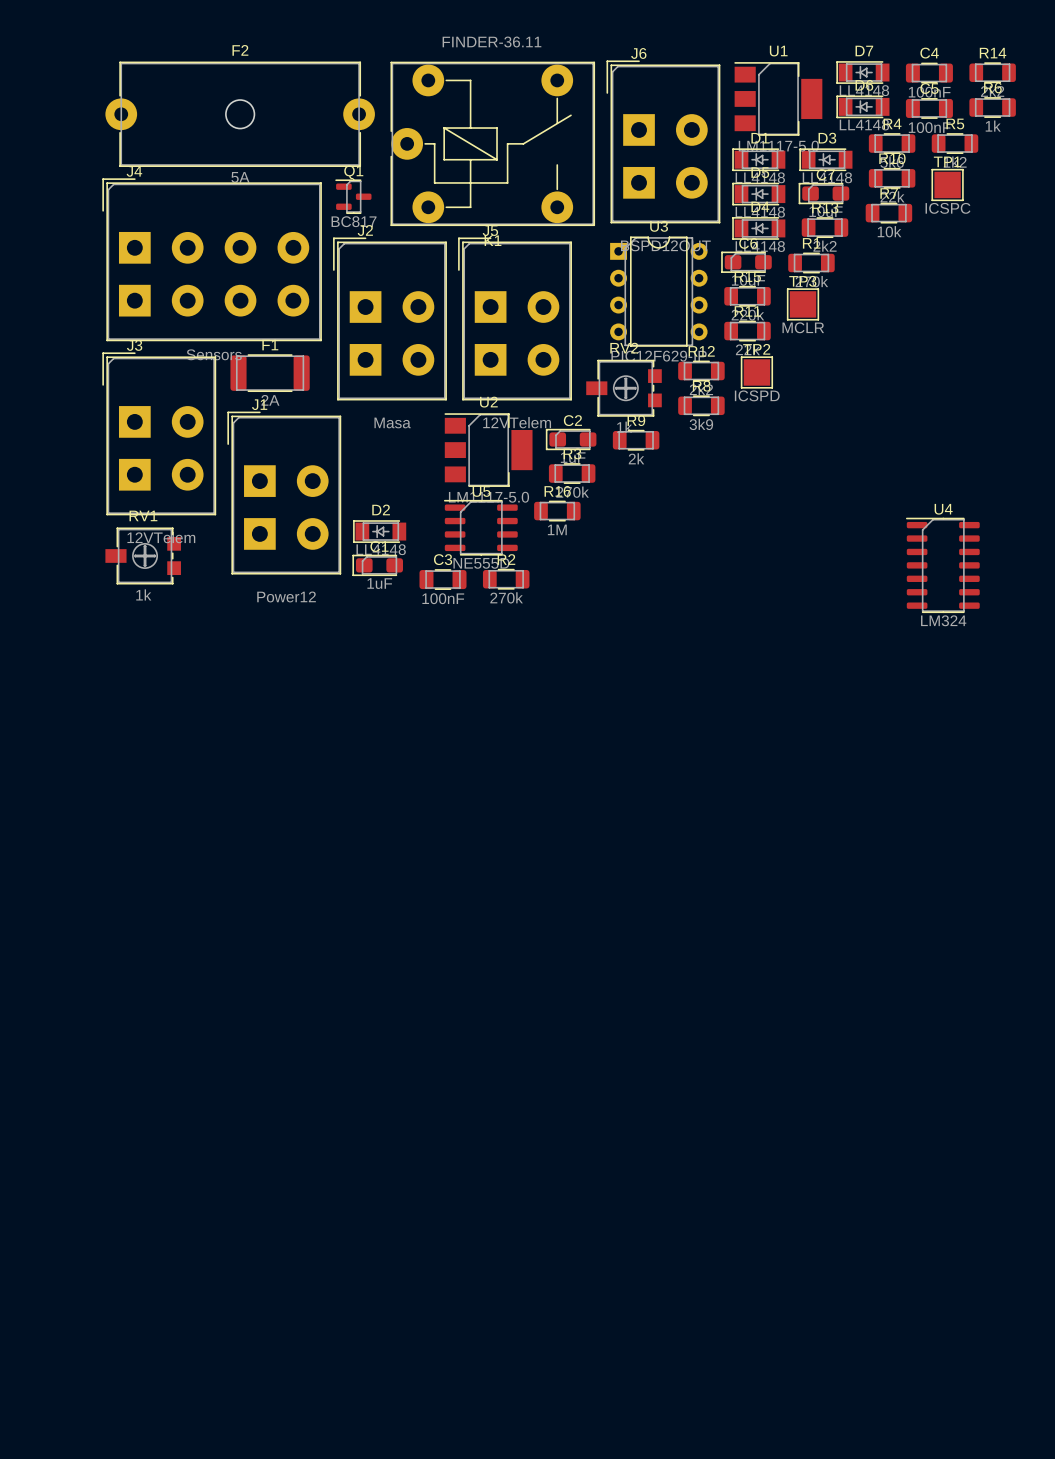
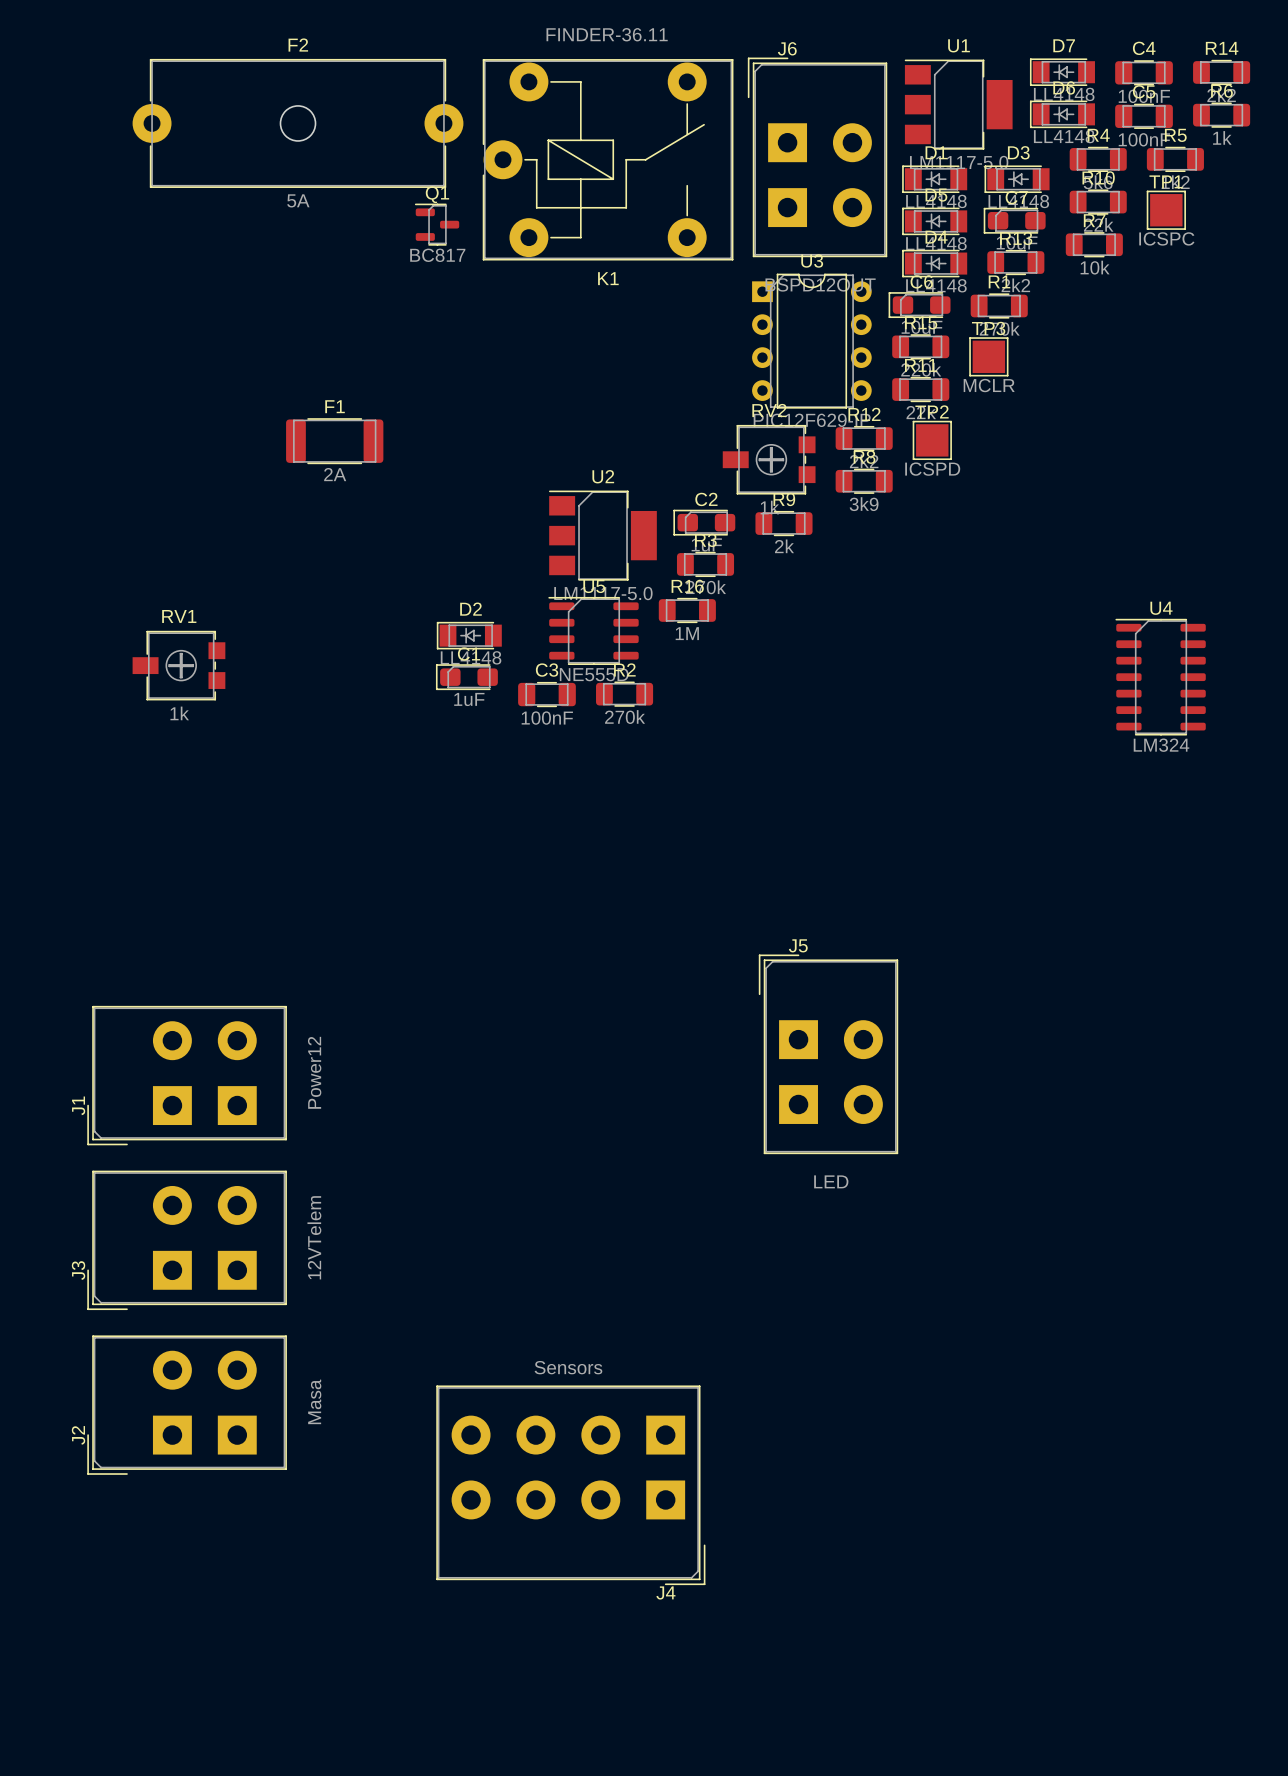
J4 rotation: 0° (212, 259) -> 180° (570, 1485)
J4 position: (212, 259) -> (570, 1485)
J2 rotation: 0° (389, 318) -> 90° counterclockwise (187, 1405)
J2 position: (389, 318) -> (187, 1405)
J5 position: (515, 318) -> (828, 1054)
J5 value: 12VTelem (517, 422) -> LED (831, 1181)
J3 rotation: 0° (159, 433) -> 90° counterclockwise (187, 1240)
J3 position: (159, 433) -> (187, 1240)
J1 rotation: 0° (284, 493) -> 90° counterclockwise (187, 1075)
J1 position: (284, 493) -> (187, 1075)

